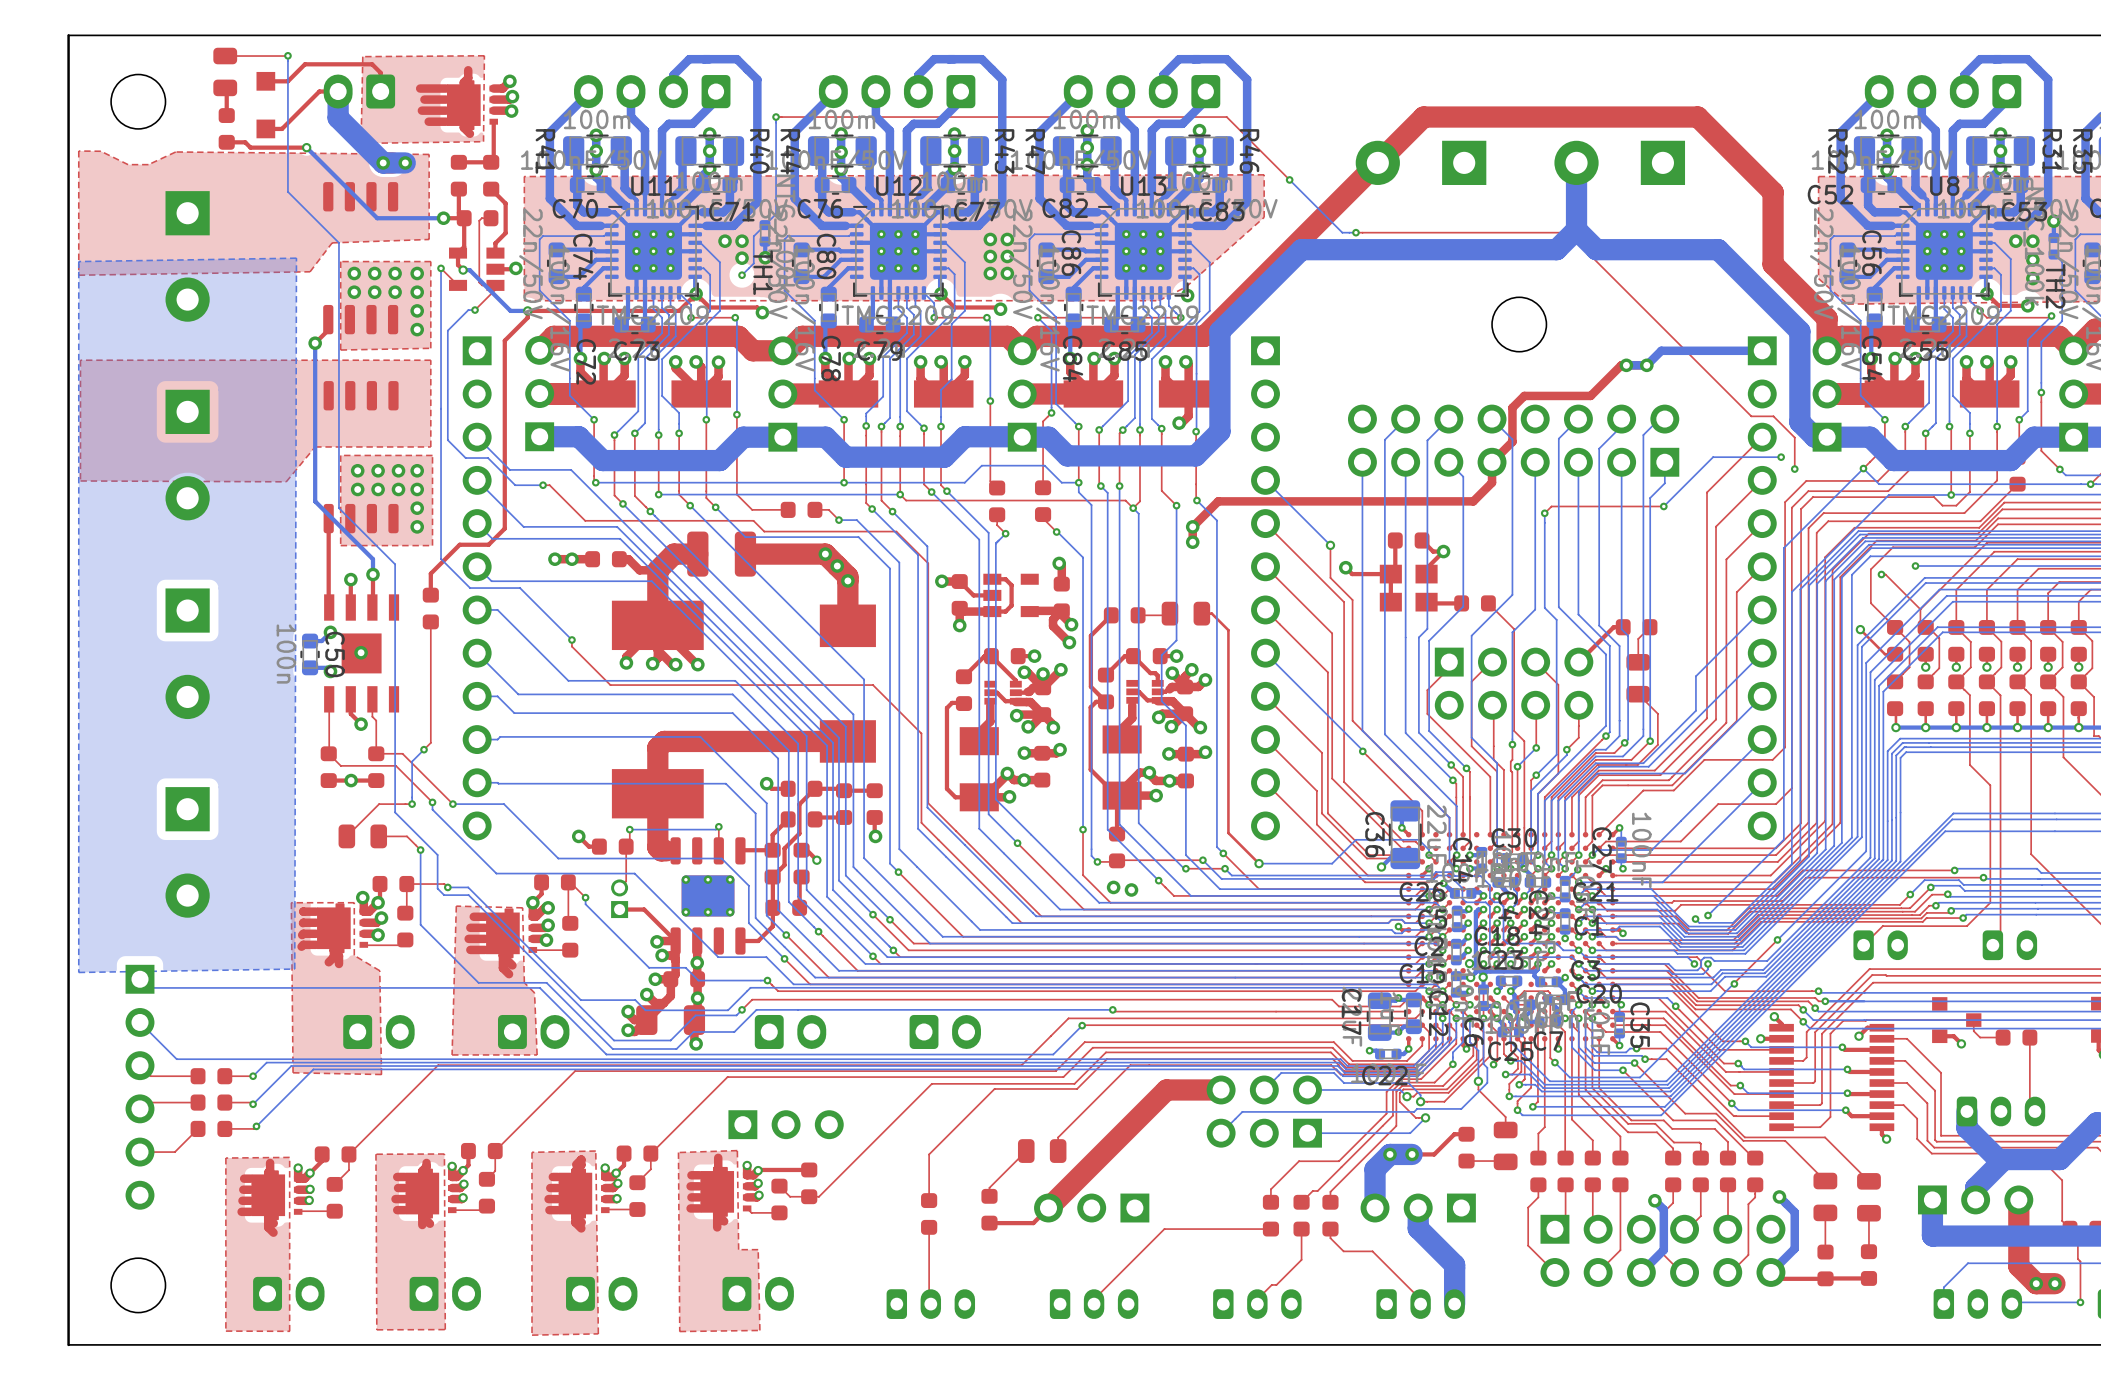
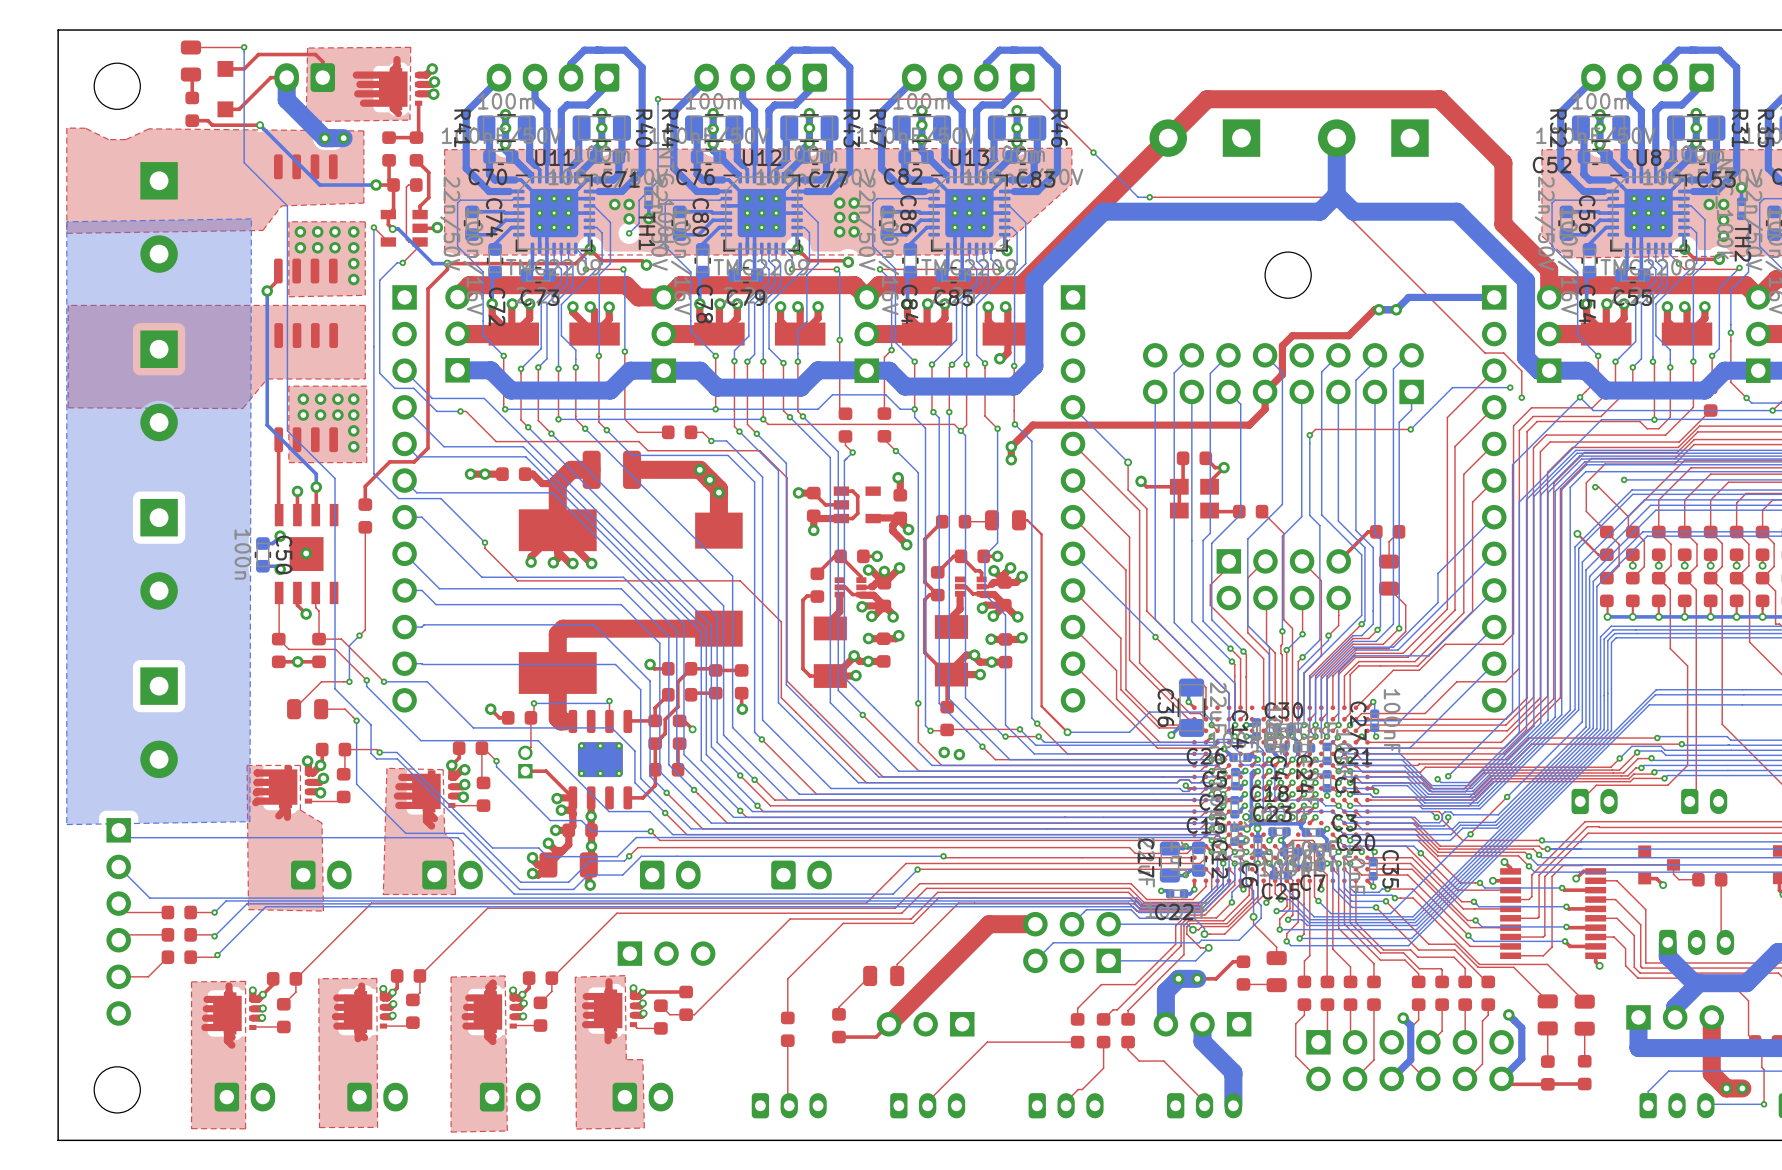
line: (68, 35) (68, 1344) -> none

